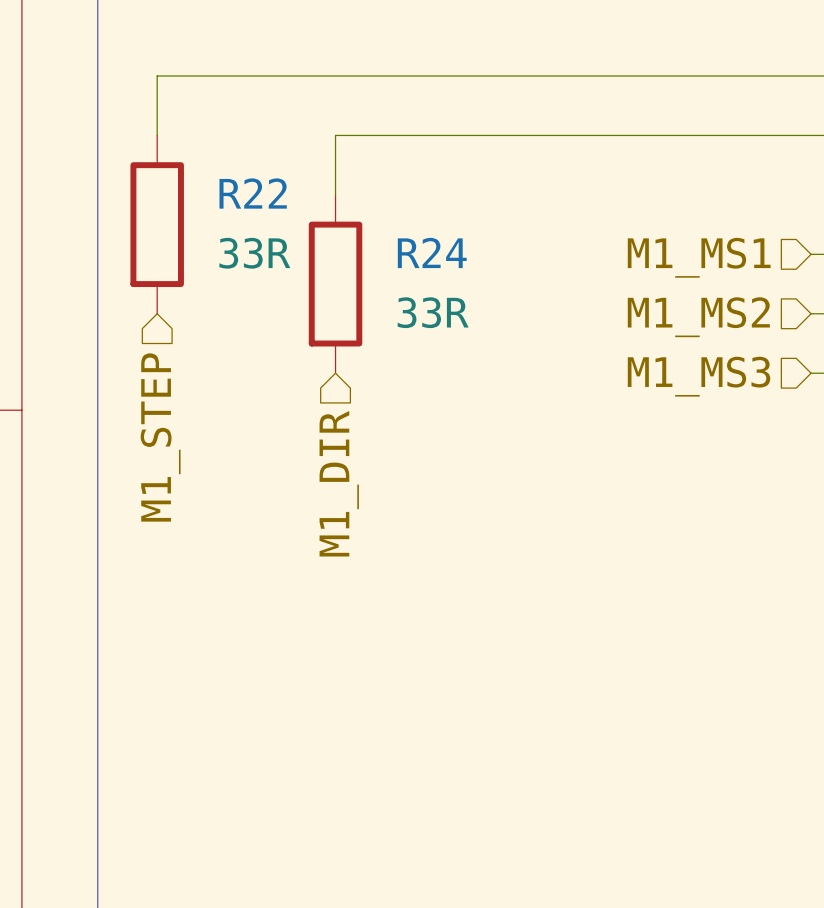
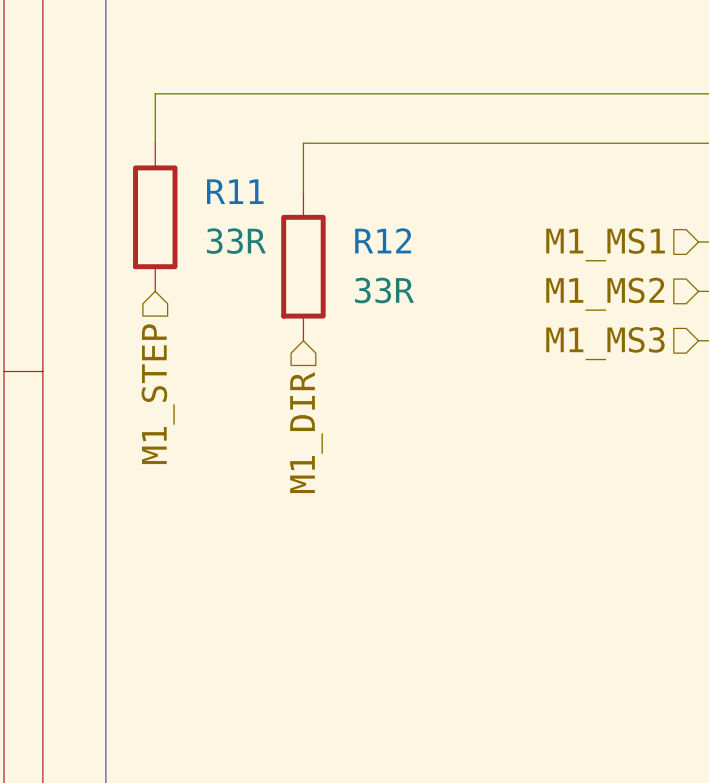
R22 name: R22 (253, 193) -> R11 (235, 191)
R24 name: R24 (432, 252) -> R12 (383, 240)

